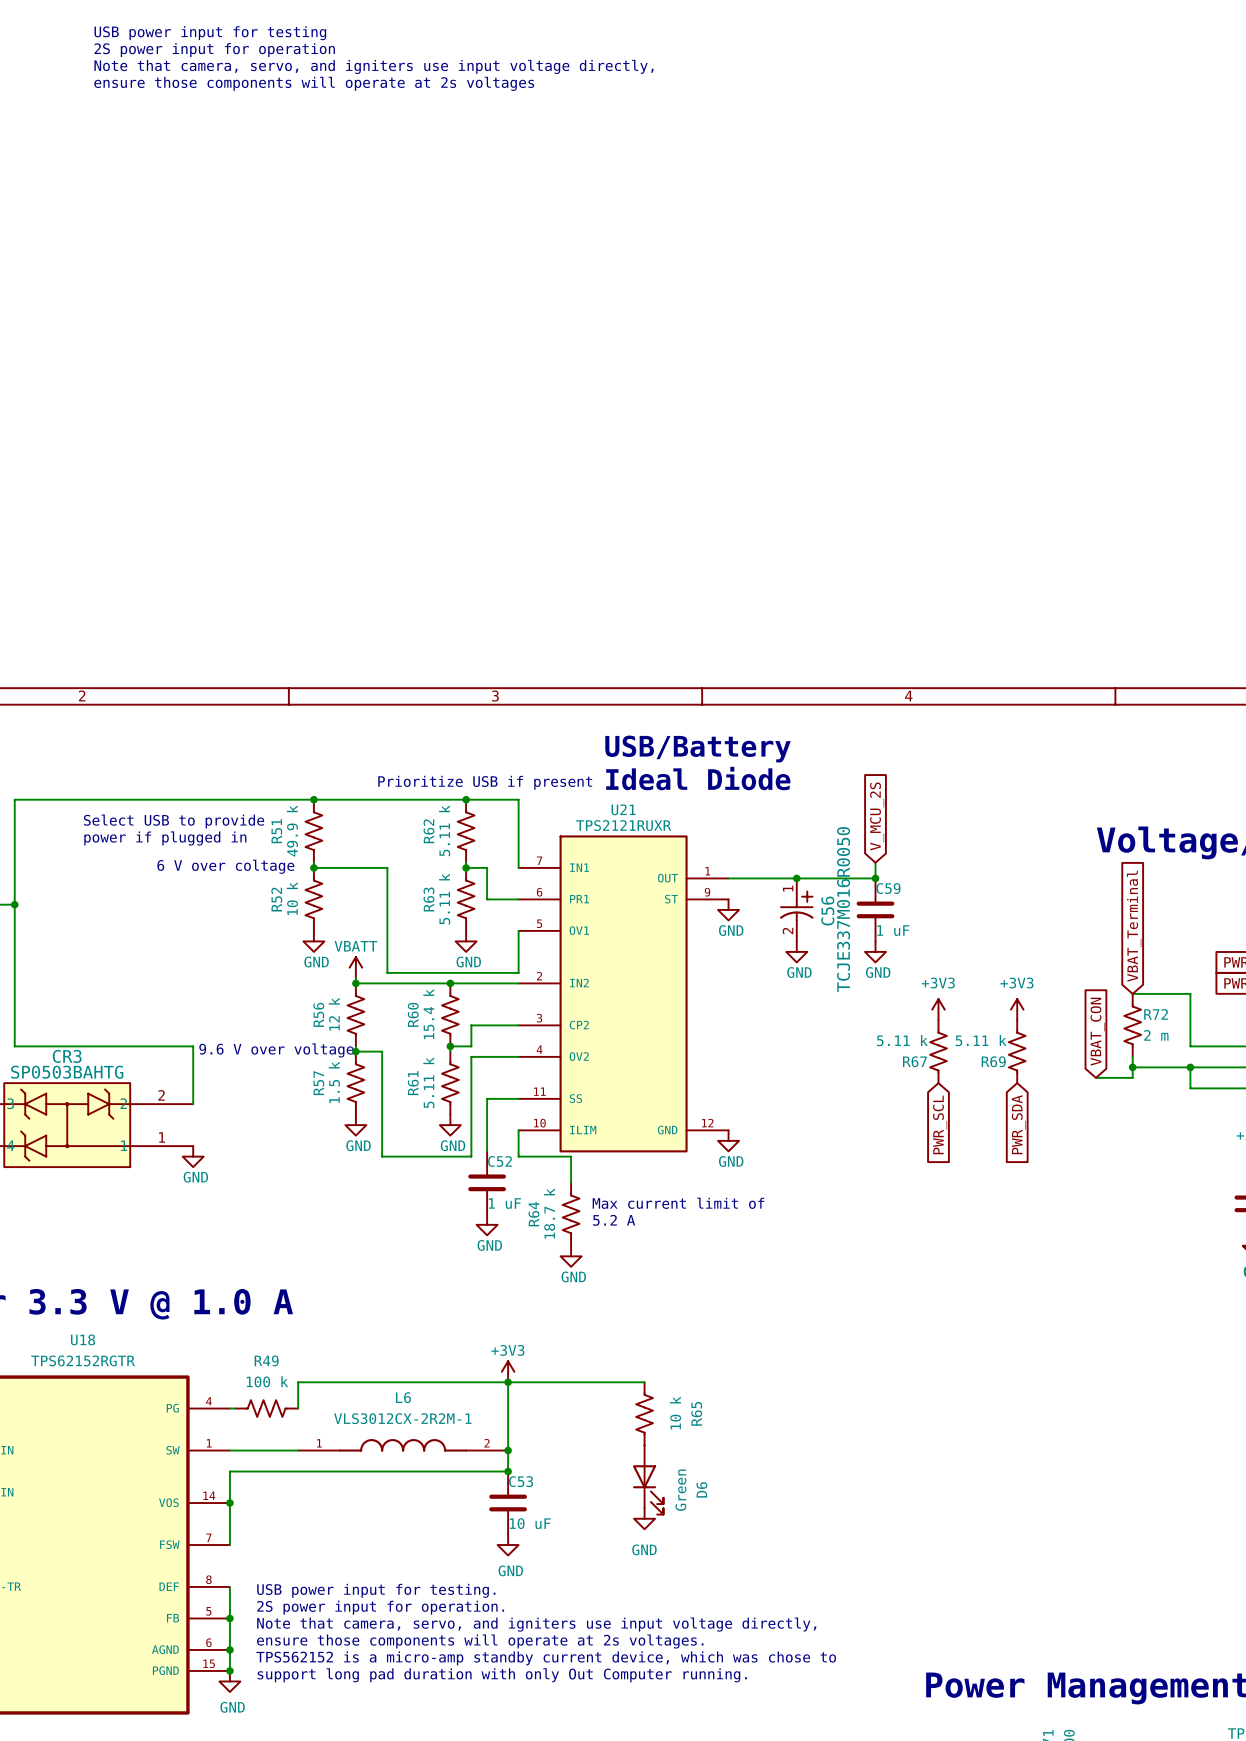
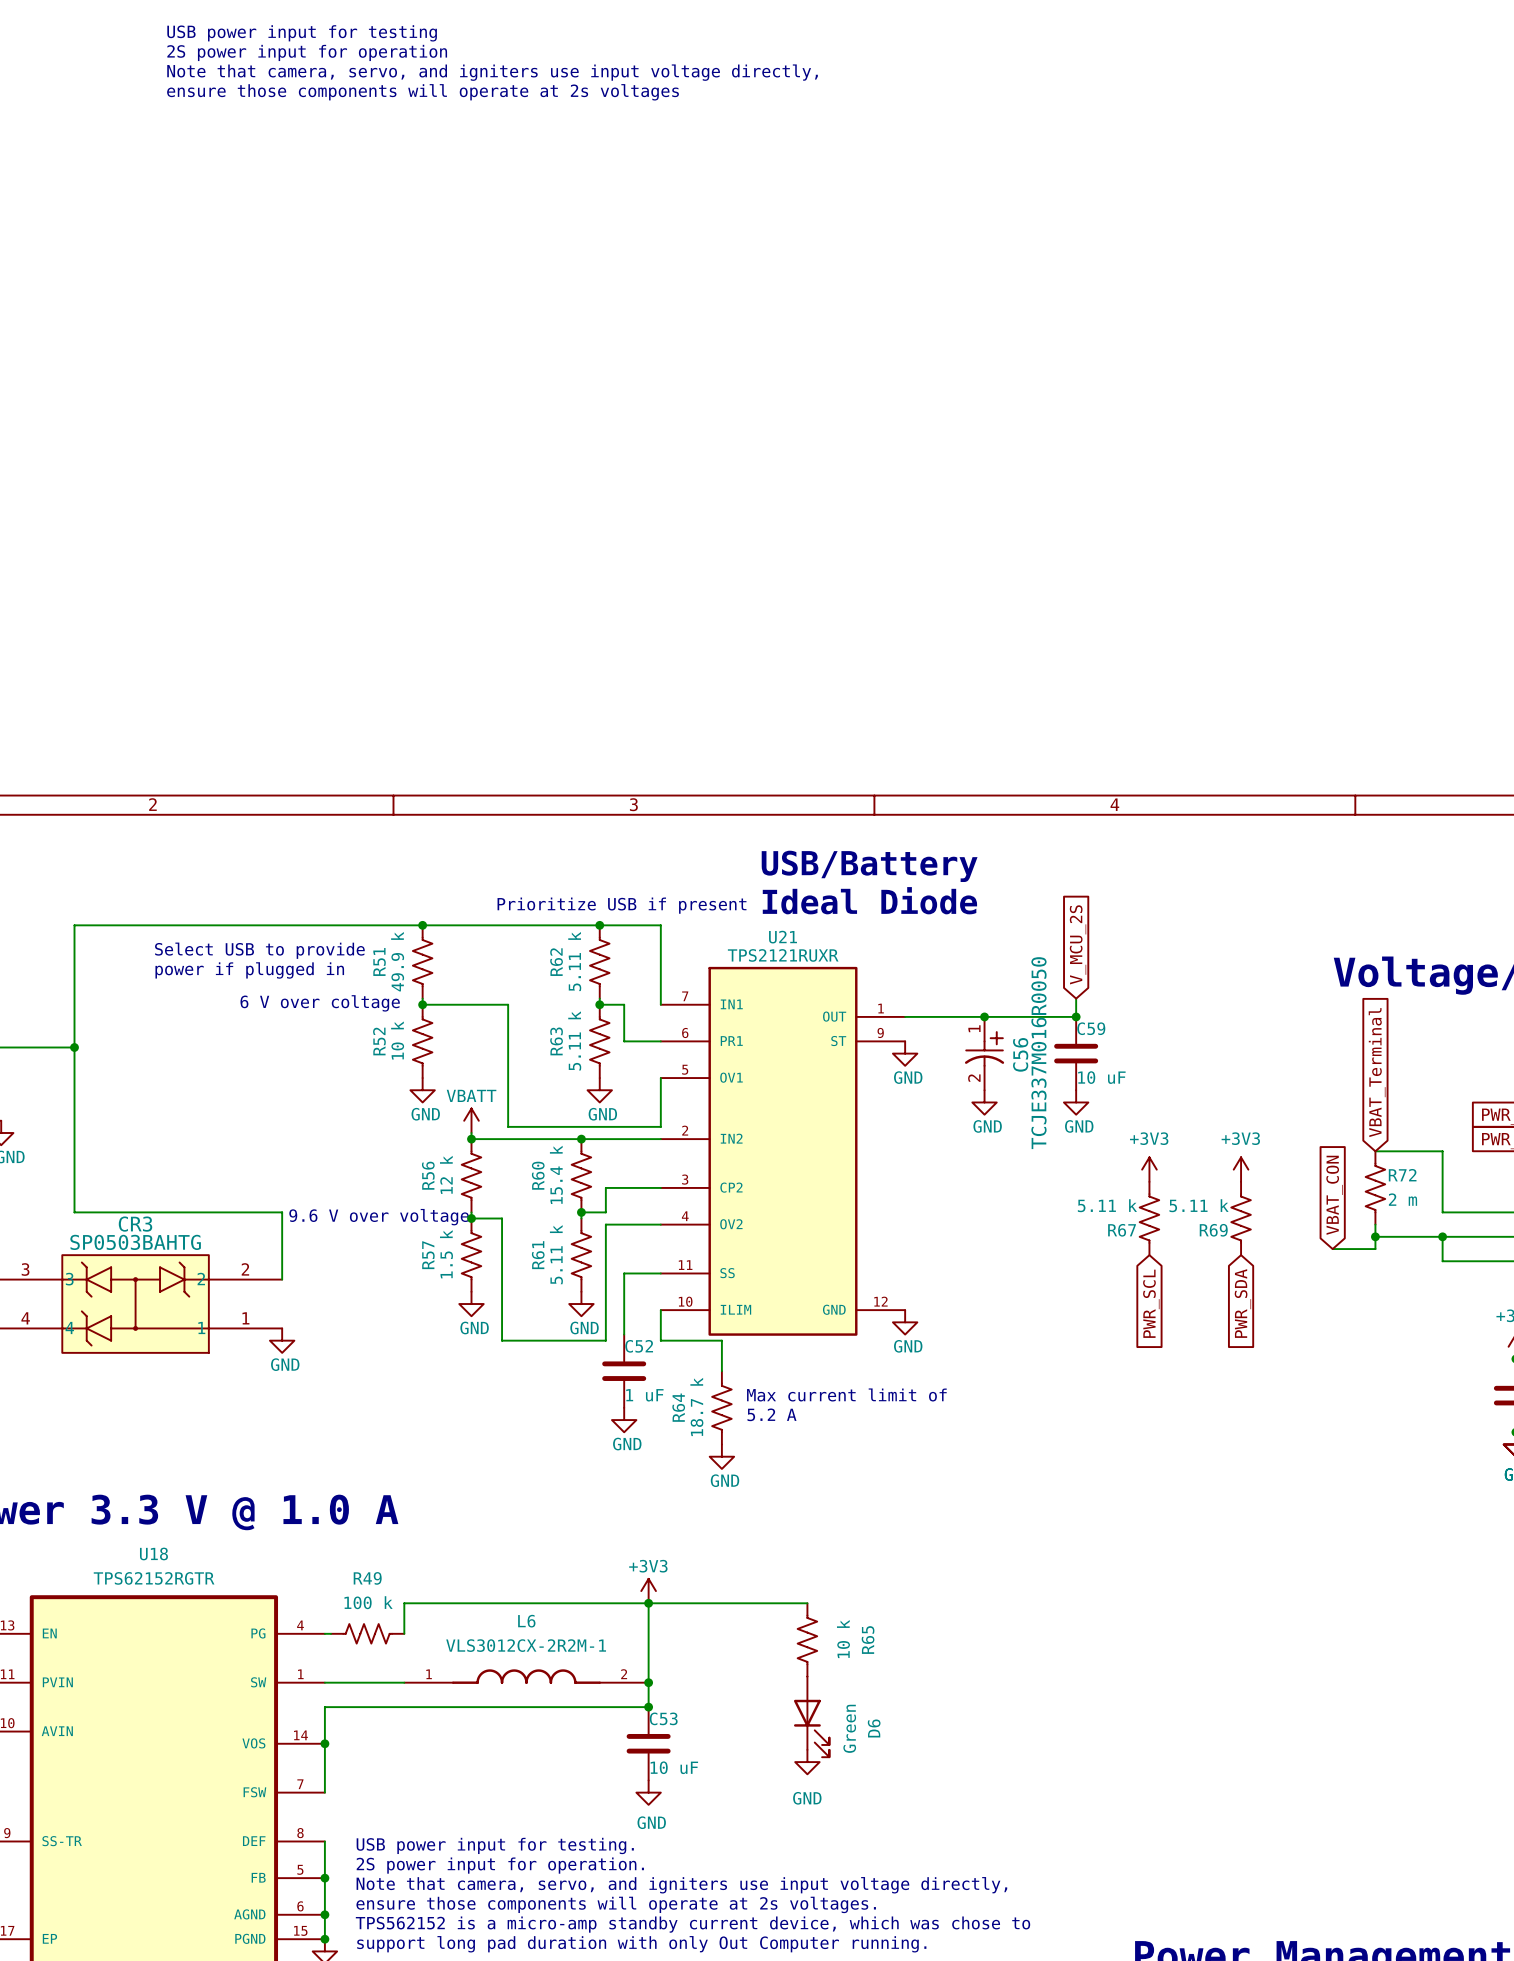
C59 value: 1 uF (893, 930) -> 10 uF (1101, 1077)

